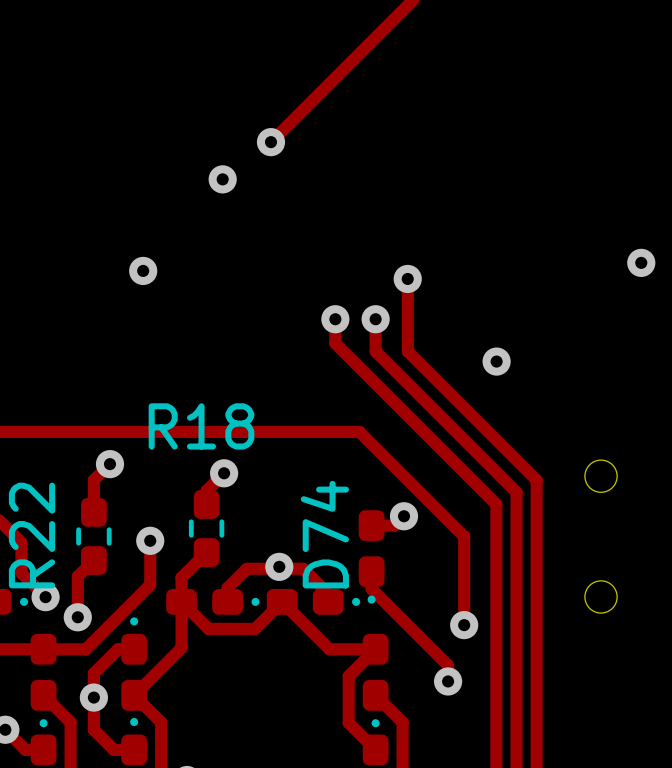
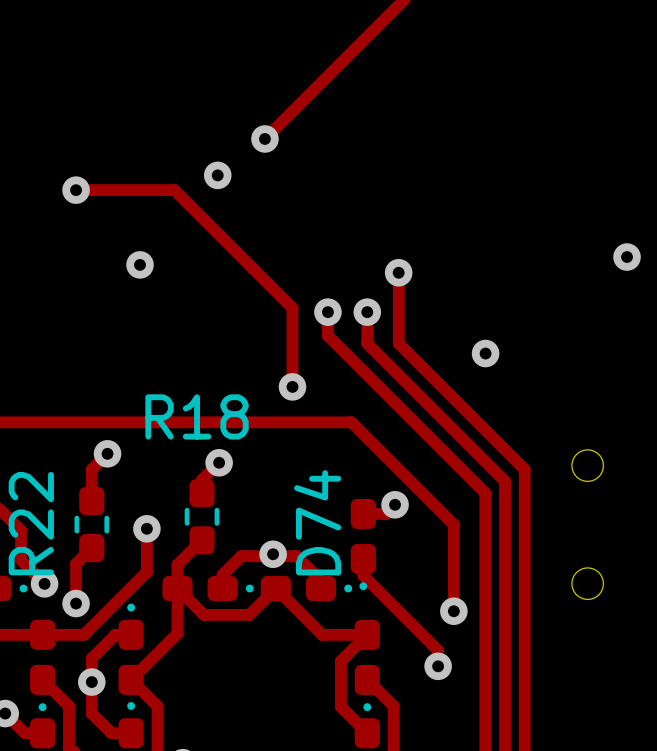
track: none -> (76, 190) (174, 190) (292, 308) (292, 386)
via: none -> (76, 190)
via: none -> (292, 386)

